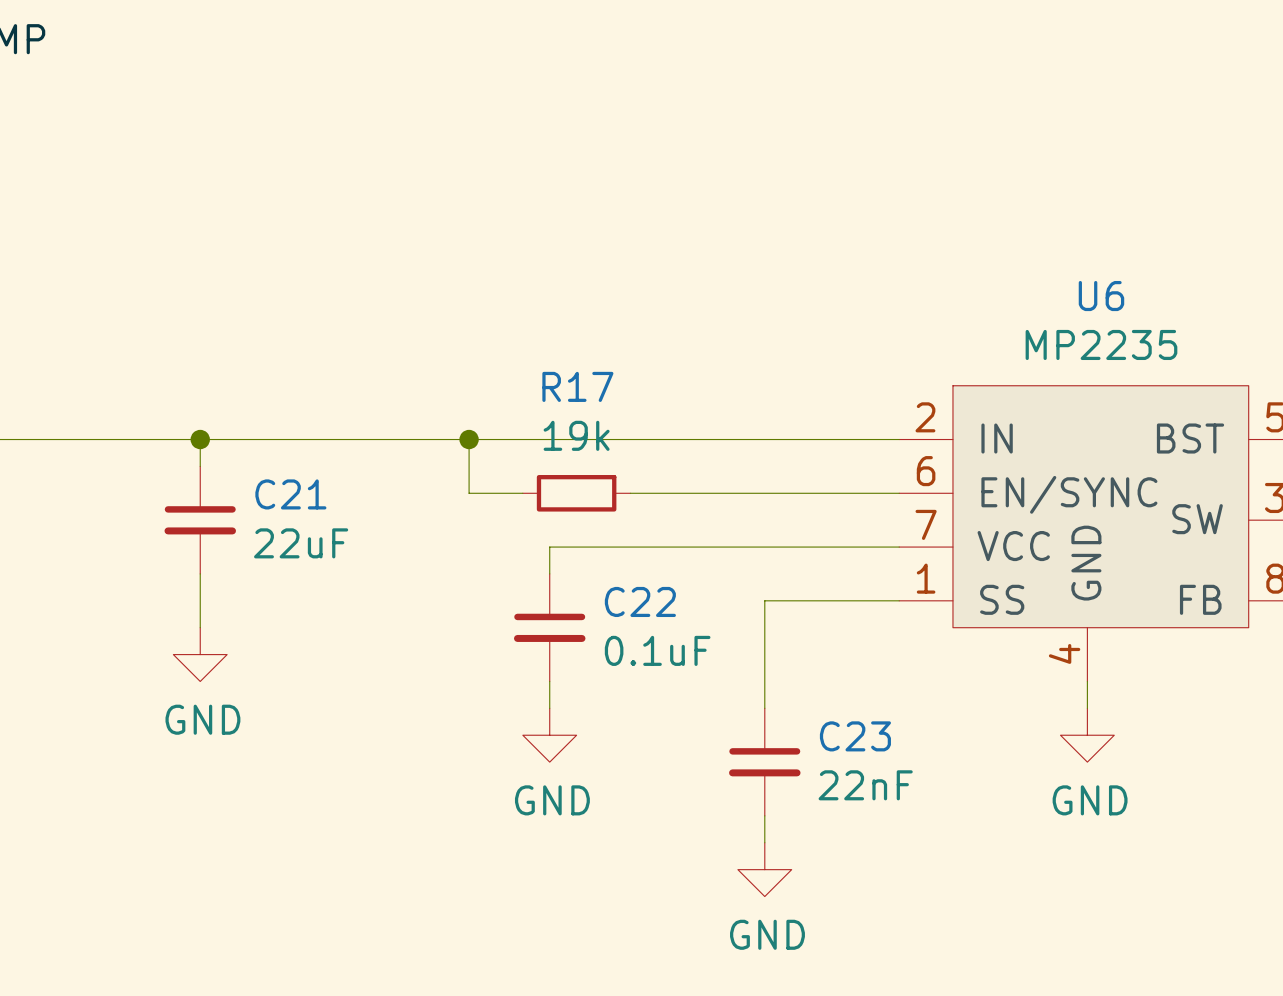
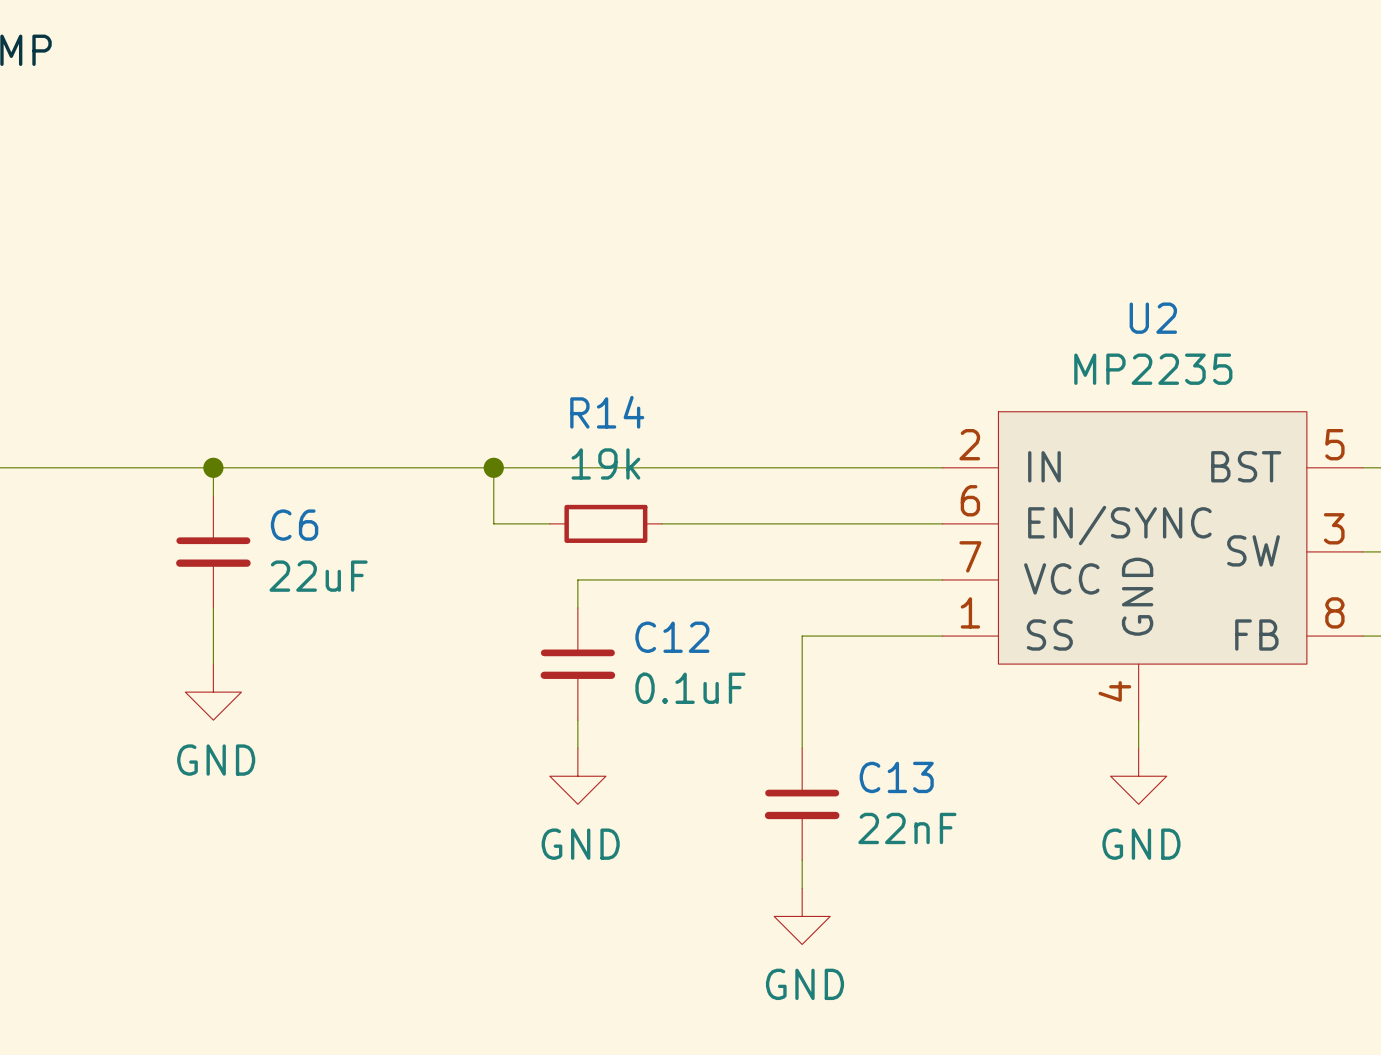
U6 name: U6 (1101, 296) -> U2 (1153, 318)
R17 name: R17 (577, 386) -> R14 (607, 412)
C21 name: C21 (290, 494) -> C6 (294, 525)
C22 name: C22 (640, 601) -> C12 (672, 637)
C23 name: C23 (855, 736) -> C13 (896, 777)

